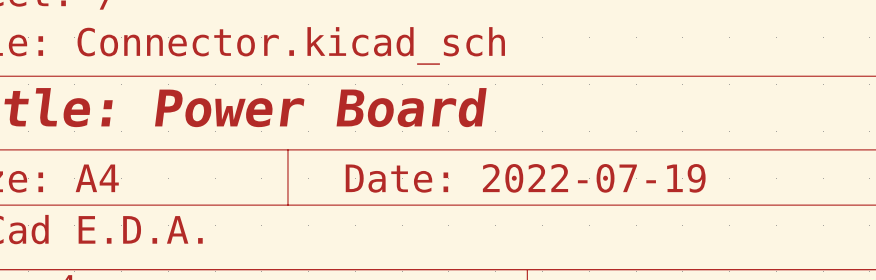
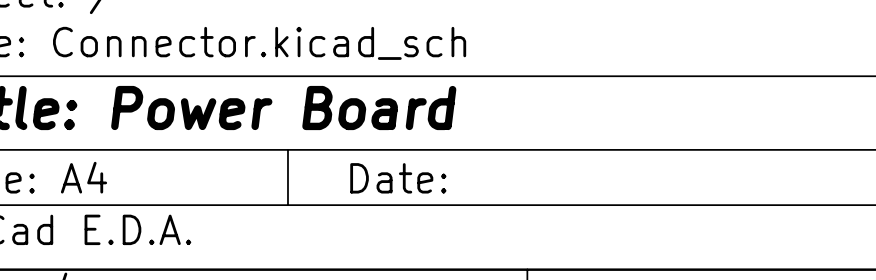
title block: Date: 2022-07-19 (525, 178) -> Date: (398, 178)

